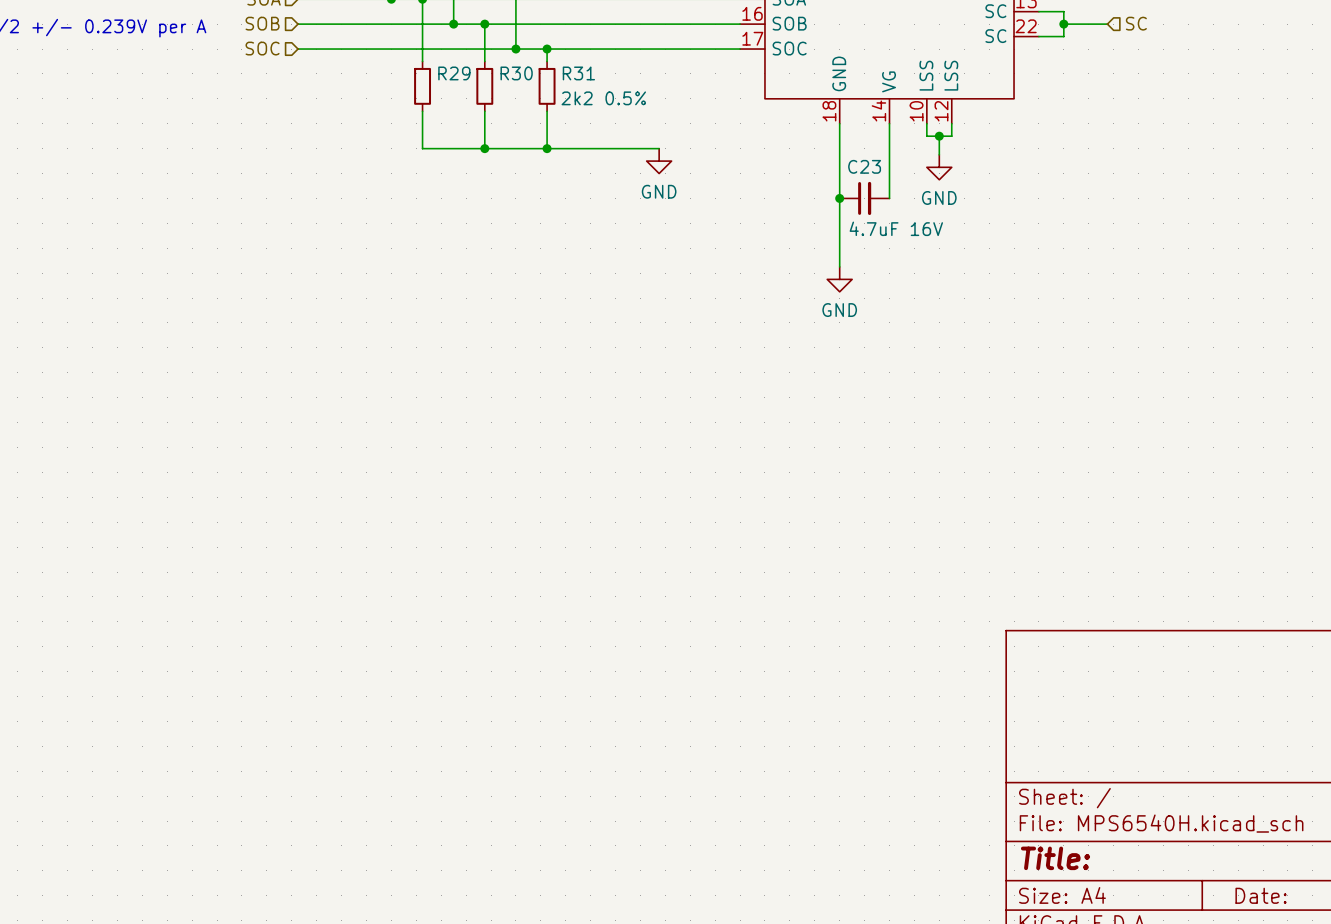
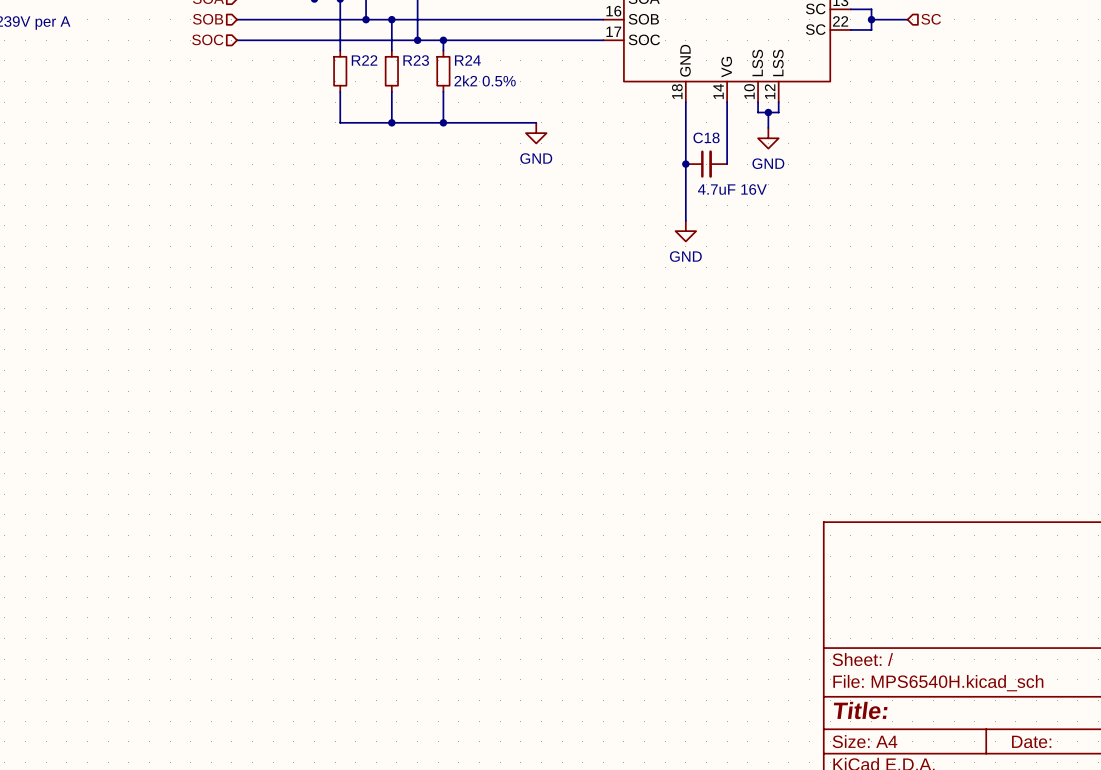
R29 name: R29 (454, 73) -> R22 (364, 60)
R30 name: R30 (516, 73) -> R23 (416, 60)
R31 name: R31 (578, 73) -> R24 (467, 60)
C23 name: C23 (864, 166) -> C18 (706, 137)

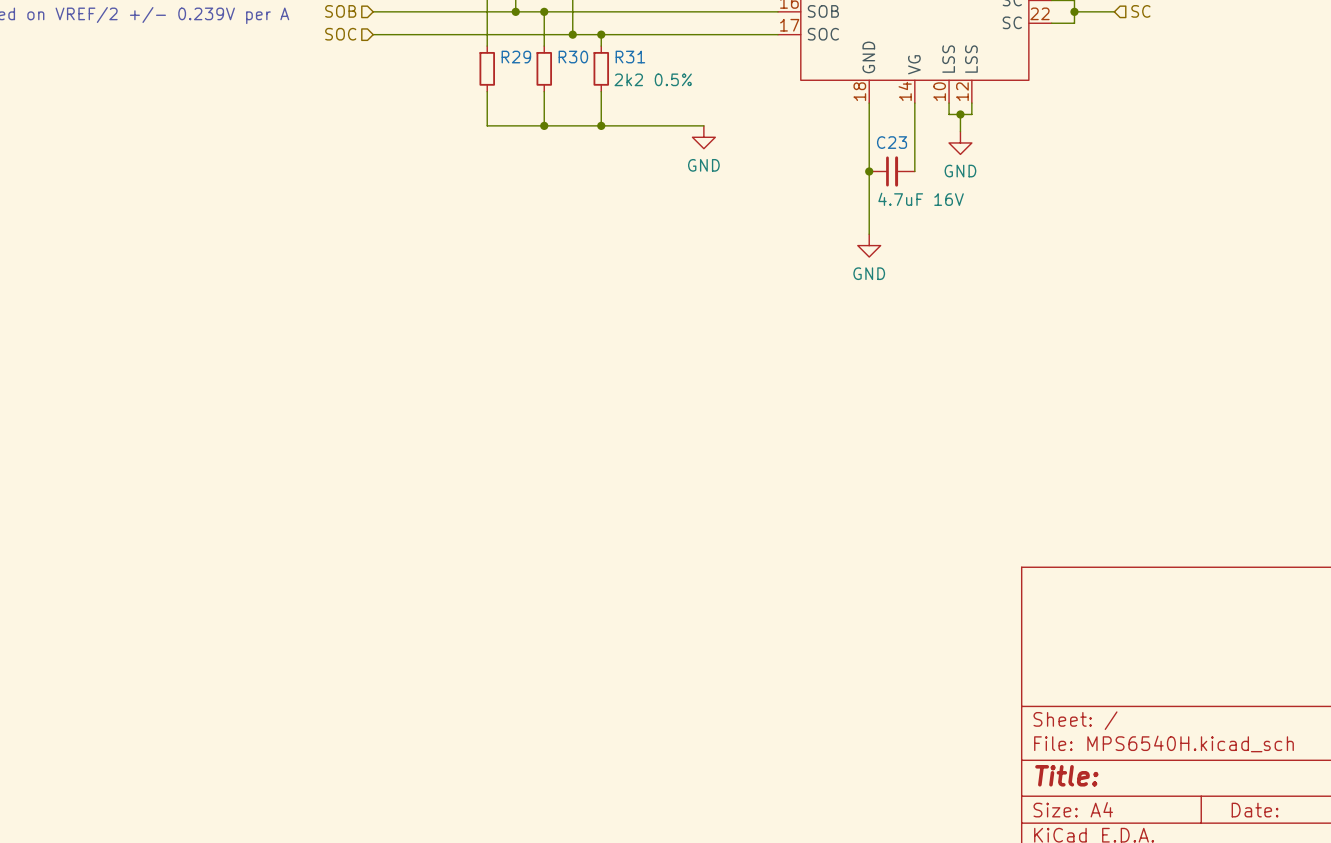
R22 name: R22 (364, 60) -> R29 (516, 57)
R23 name: R23 (416, 60) -> R30 (573, 57)
R24 name: R24 (467, 60) -> R31 (630, 57)
C18 name: C18 (706, 137) -> C23 (892, 142)

